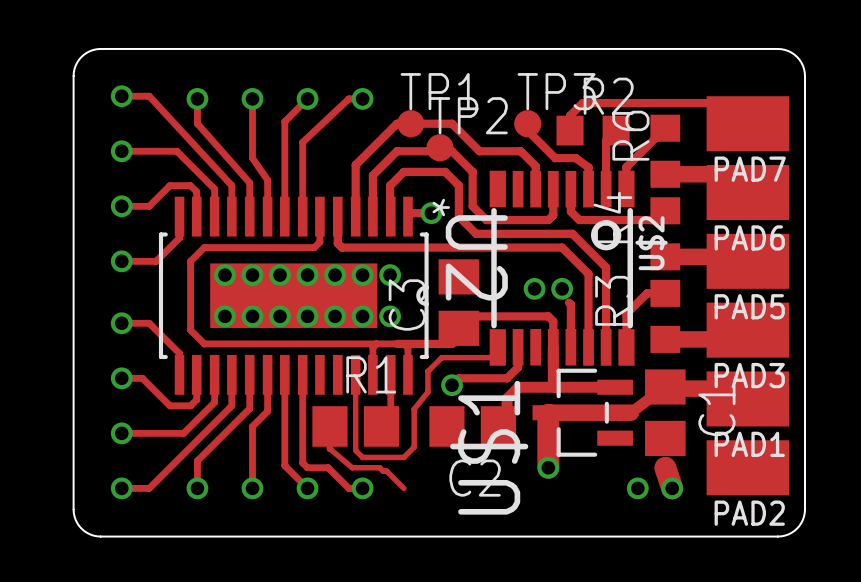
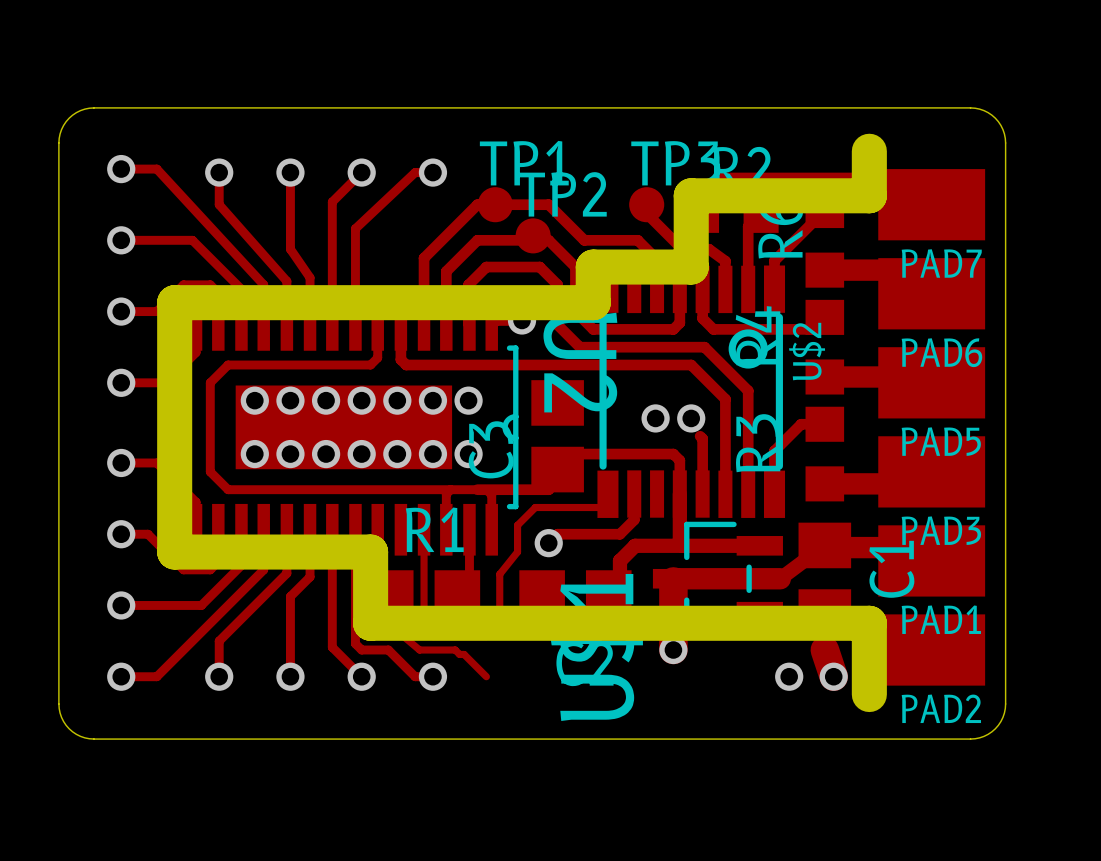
board edge: none -> (869, 151) (869, 195) (691, 195) (691, 267) (593, 267) (593, 302) (174, 302) (174, 552) (370, 552) (370, 623) (869, 623) (869, 694)

